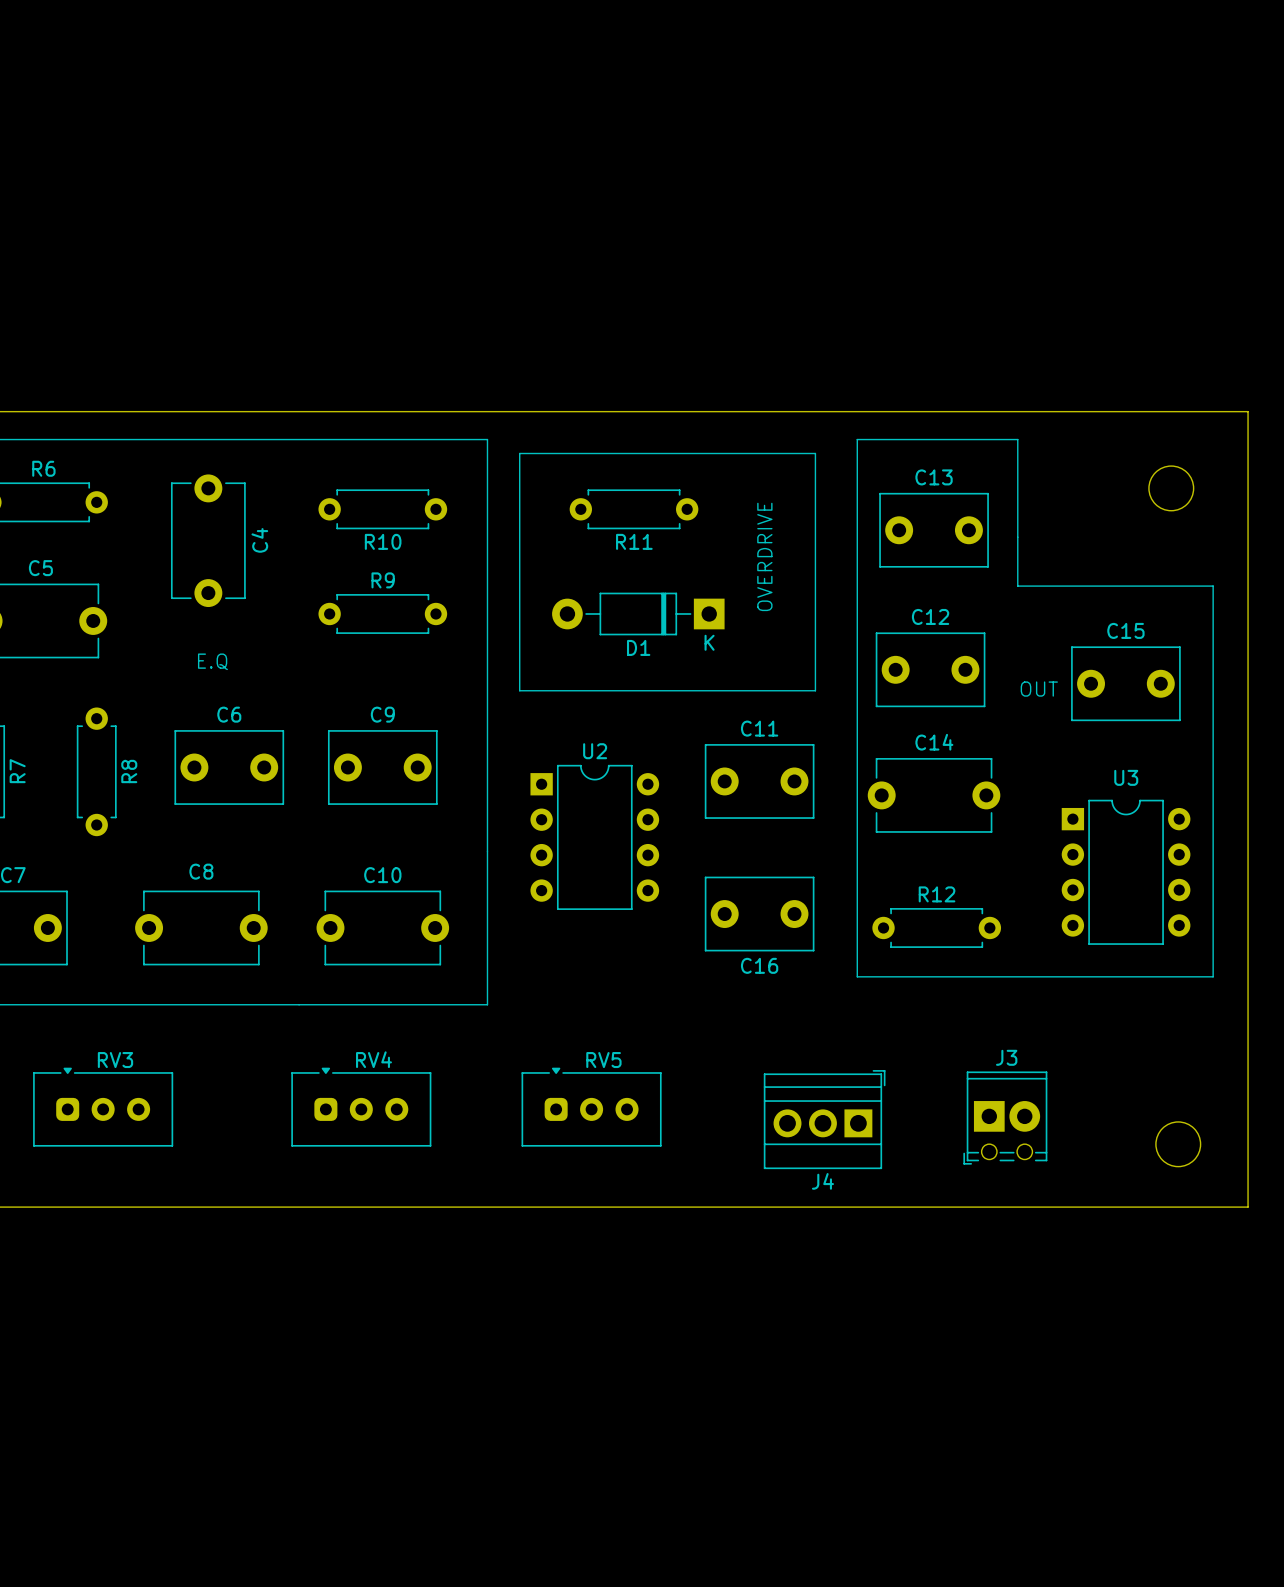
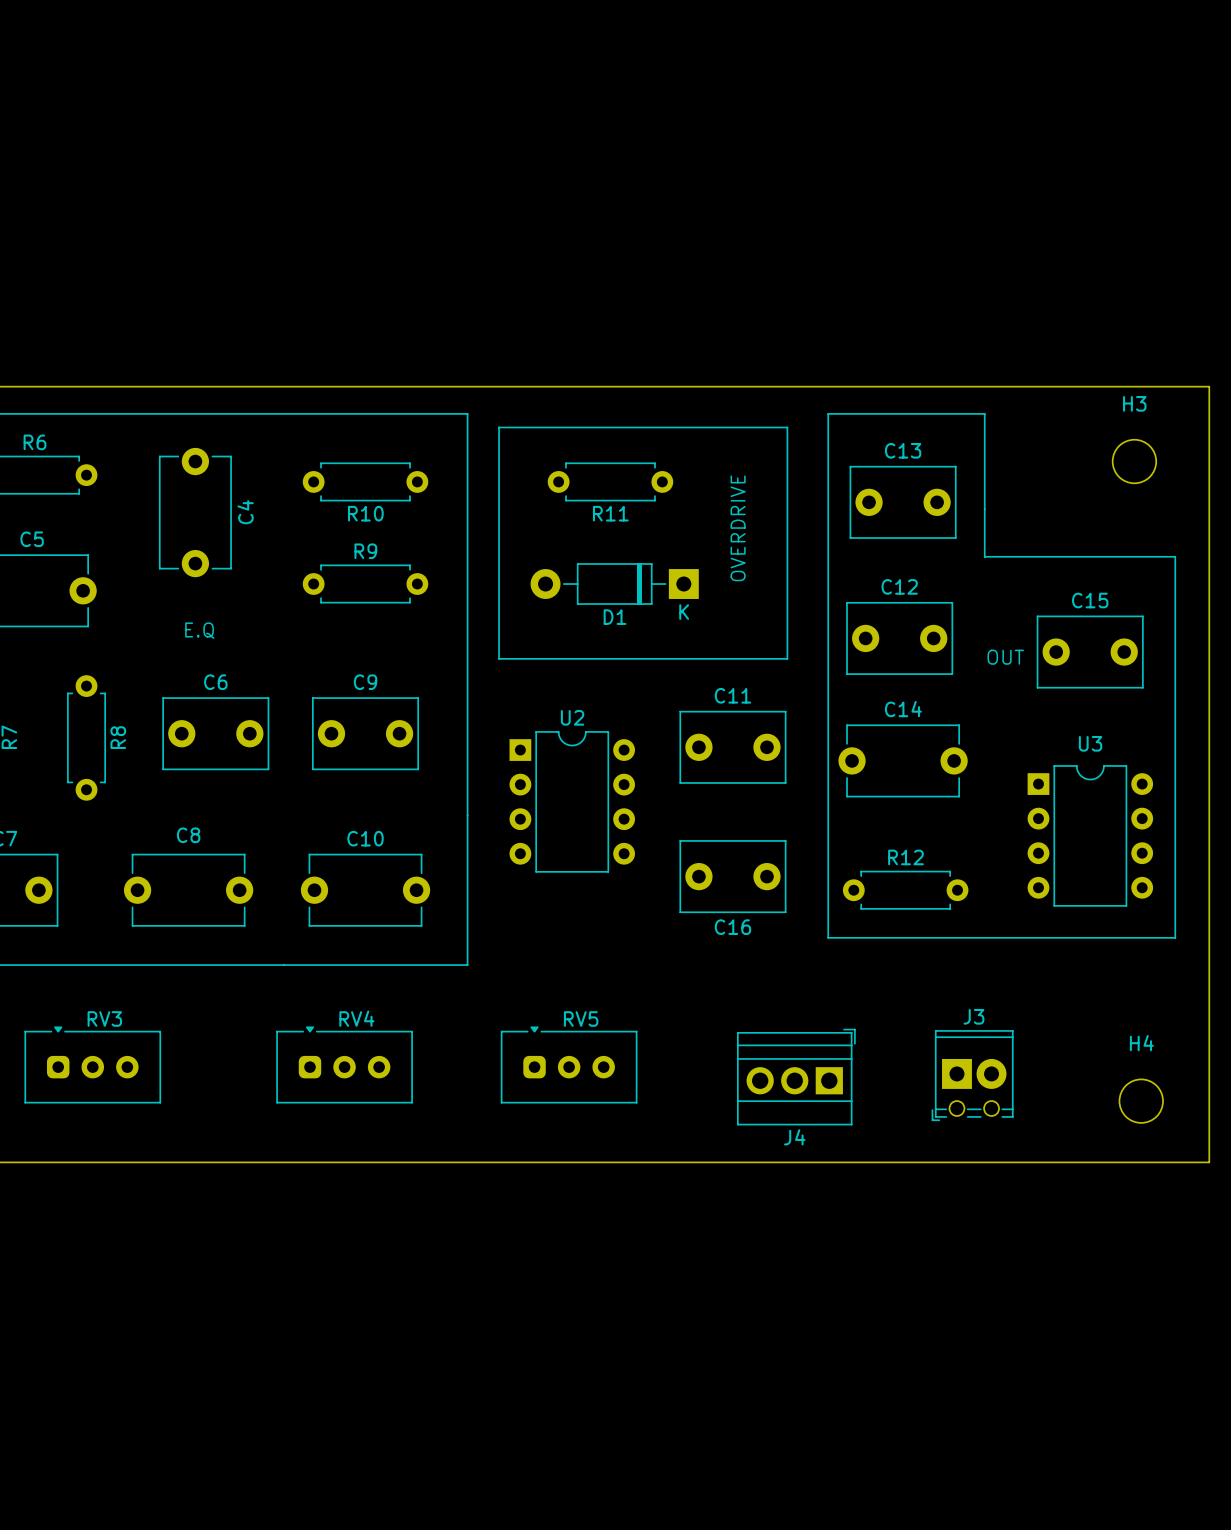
H3 name: none -> H3 (1134, 403)
H4 name: none -> H4 (1141, 1043)

